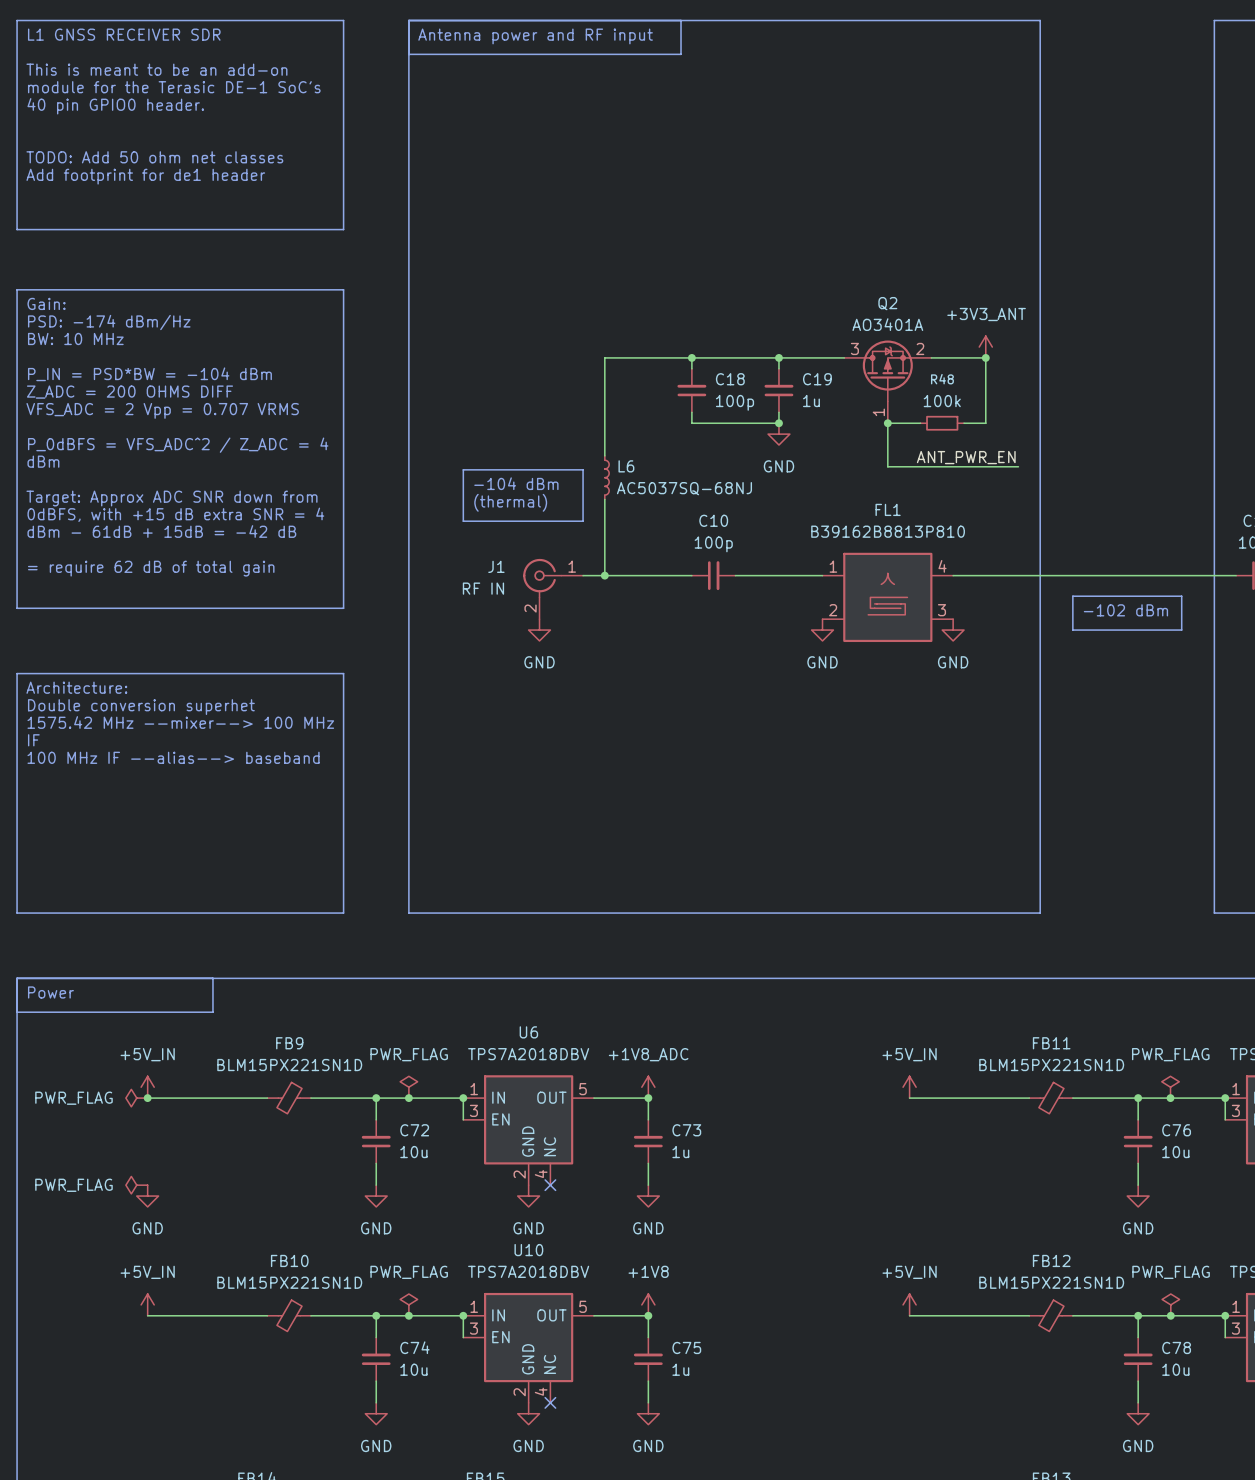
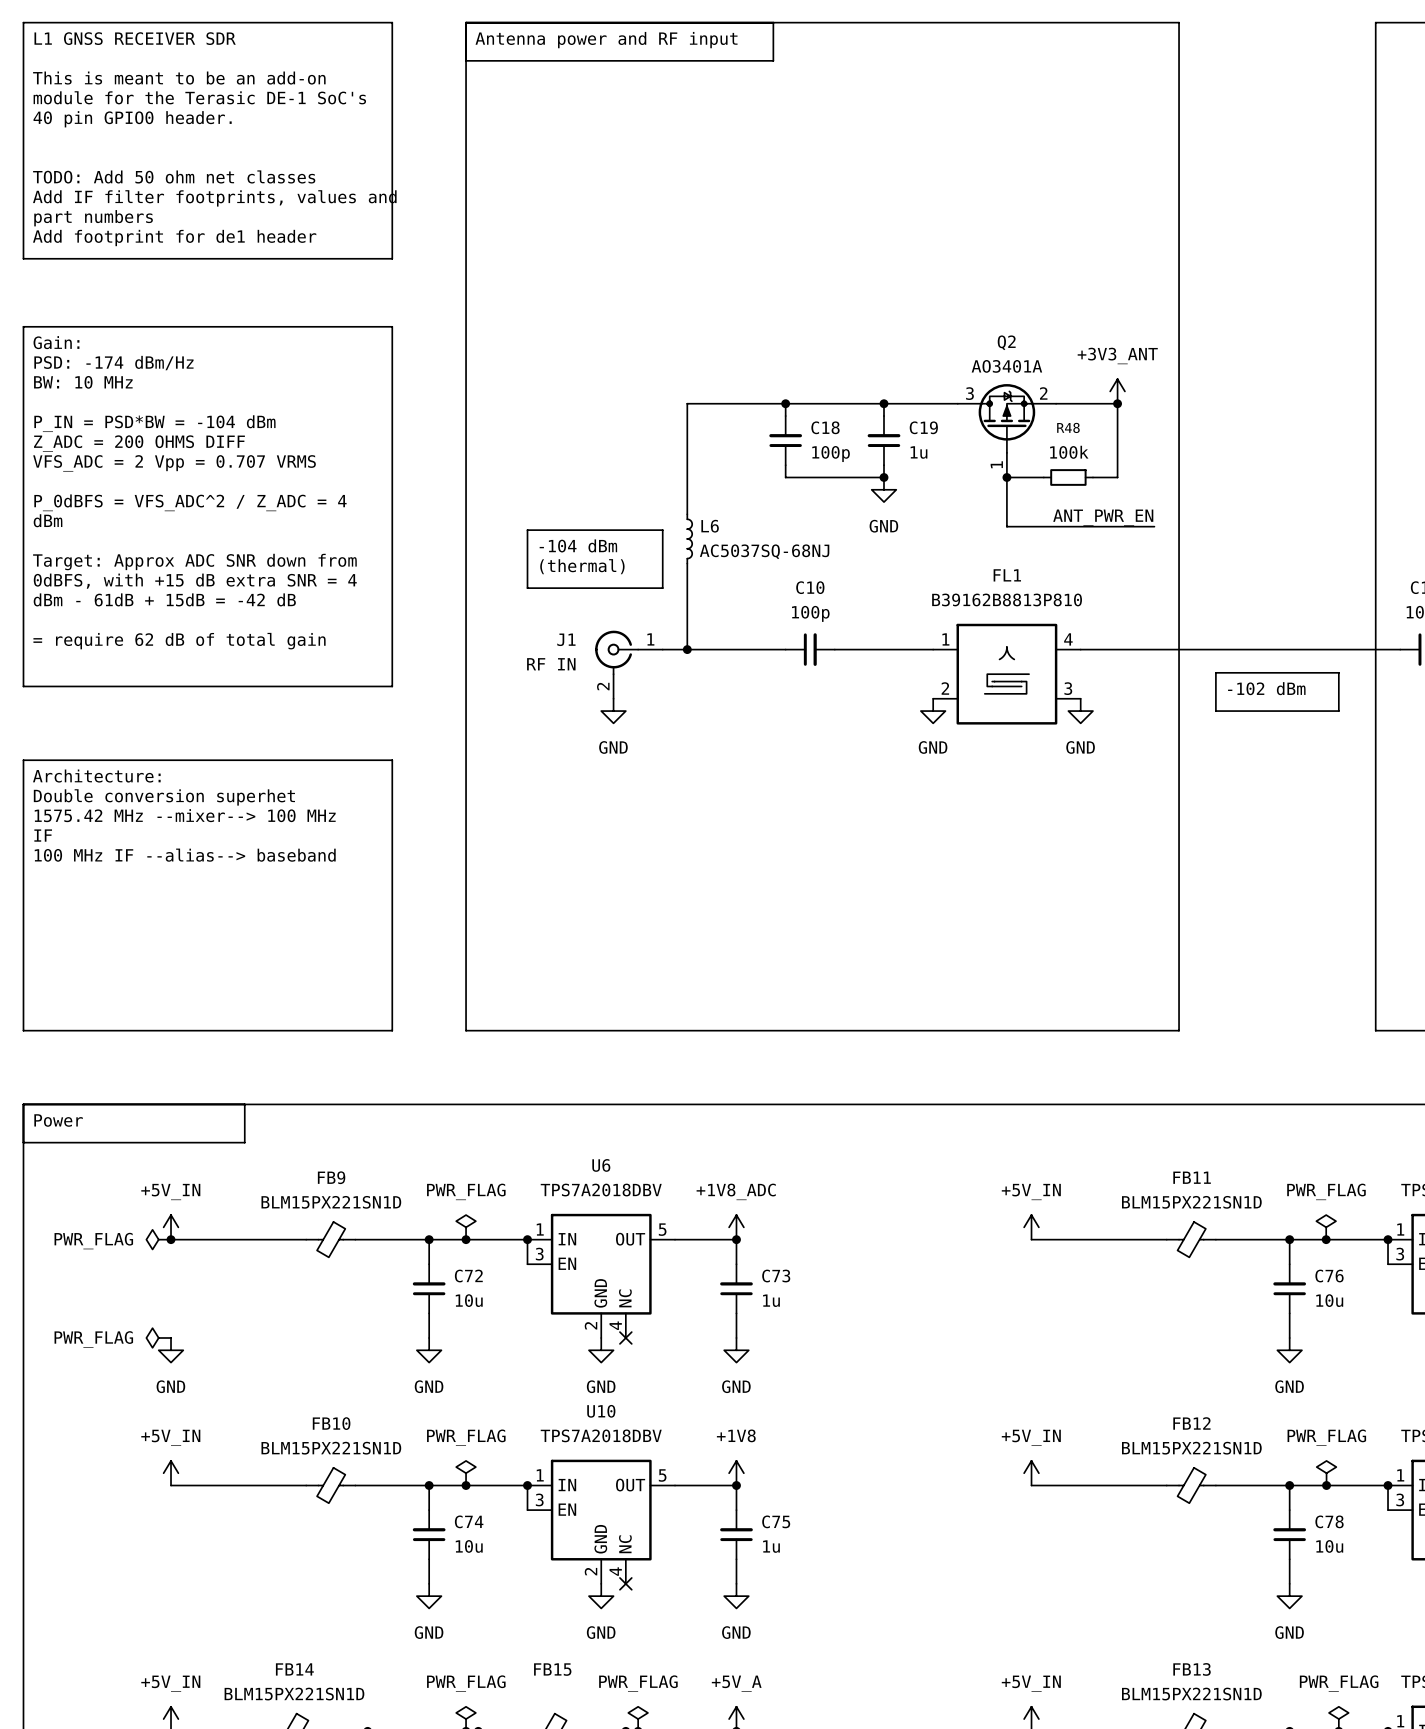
text: Add footprint for de1 header (145, 176) -> Add IF filter footprints, values and (214, 198)
text: none -> part numbers (93, 218)
text: none -> Add footprint for de1 header (174, 238)

